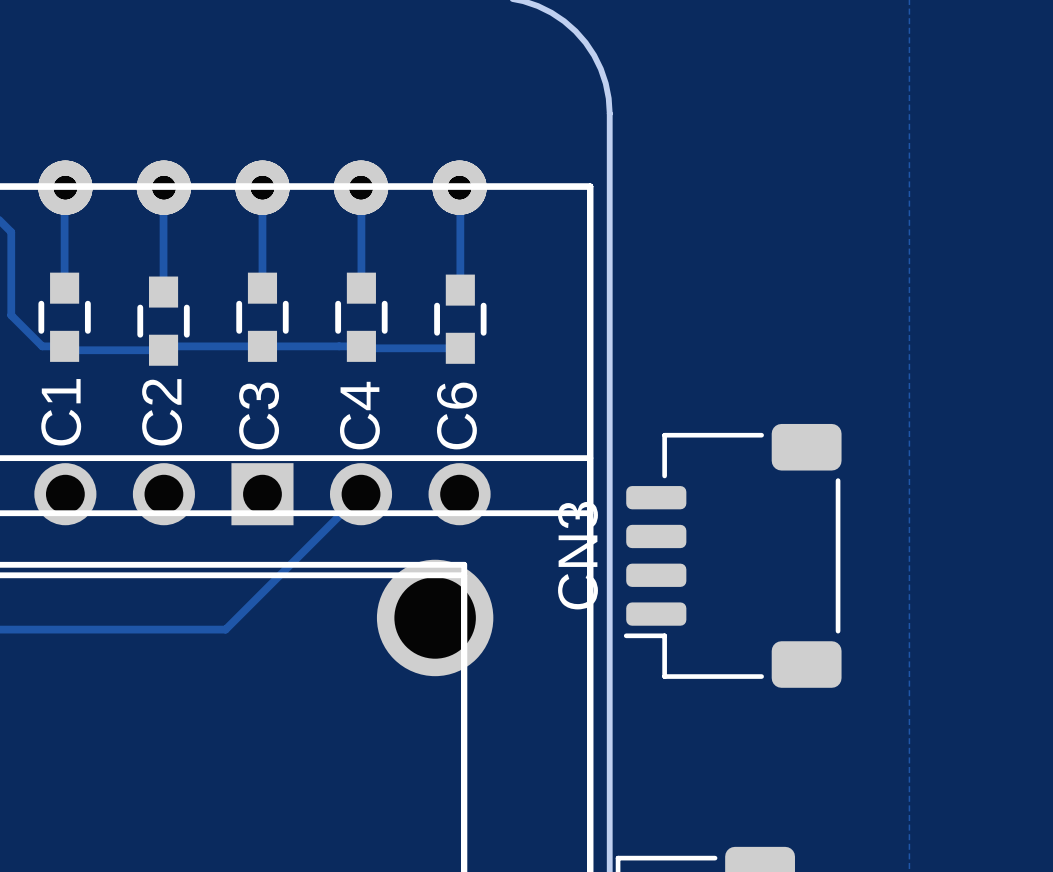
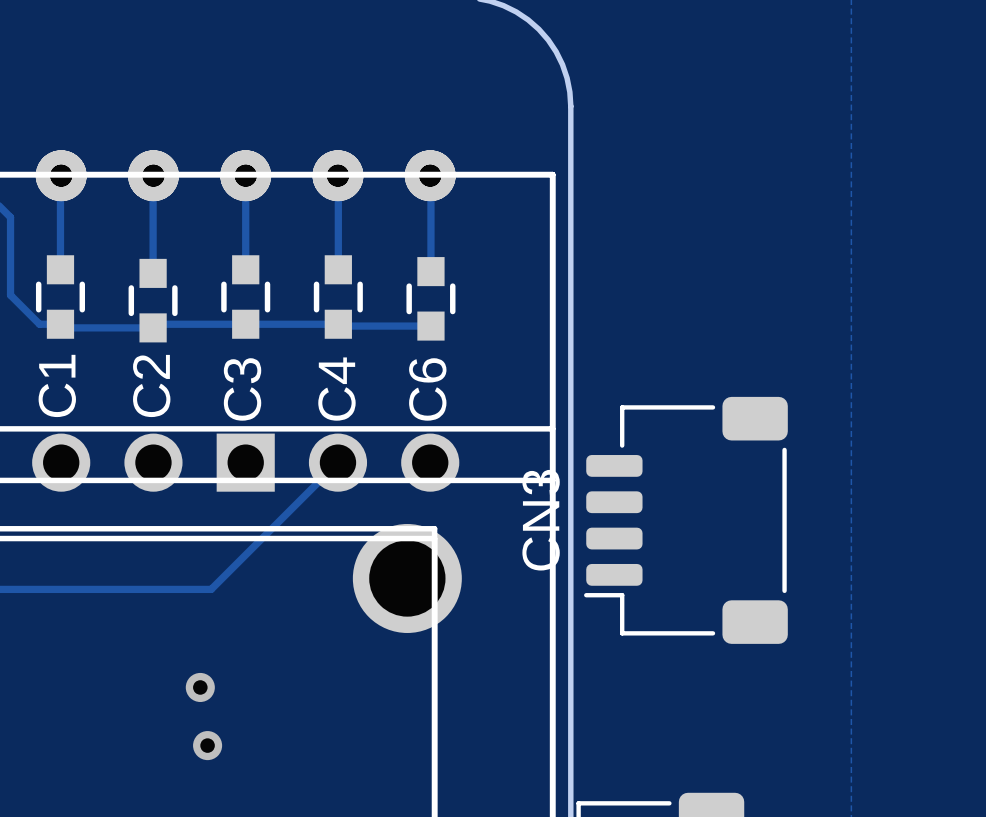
via: none -> (200, 687)
via: none -> (207, 745)

